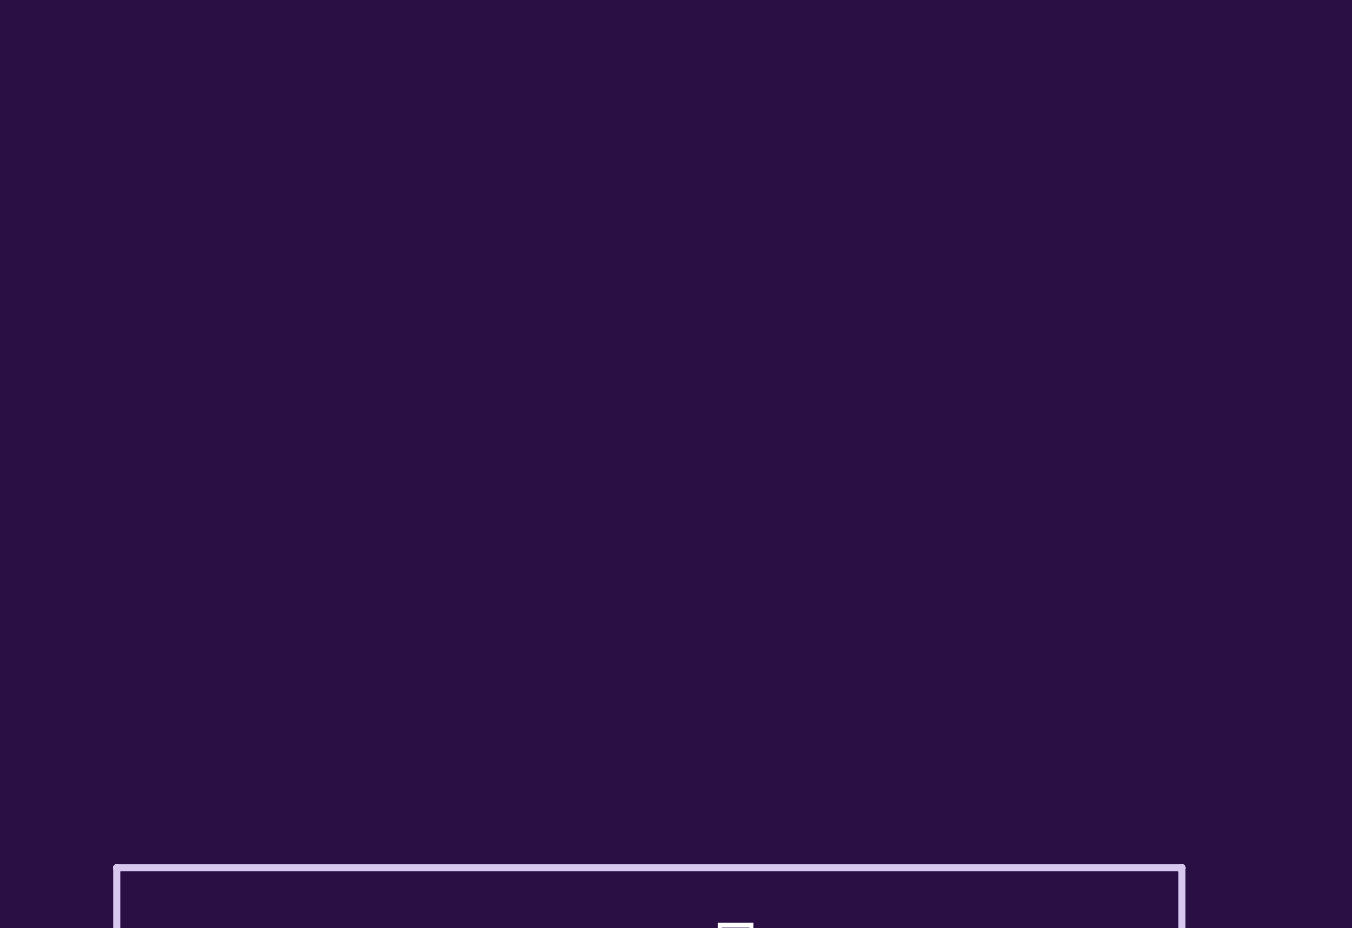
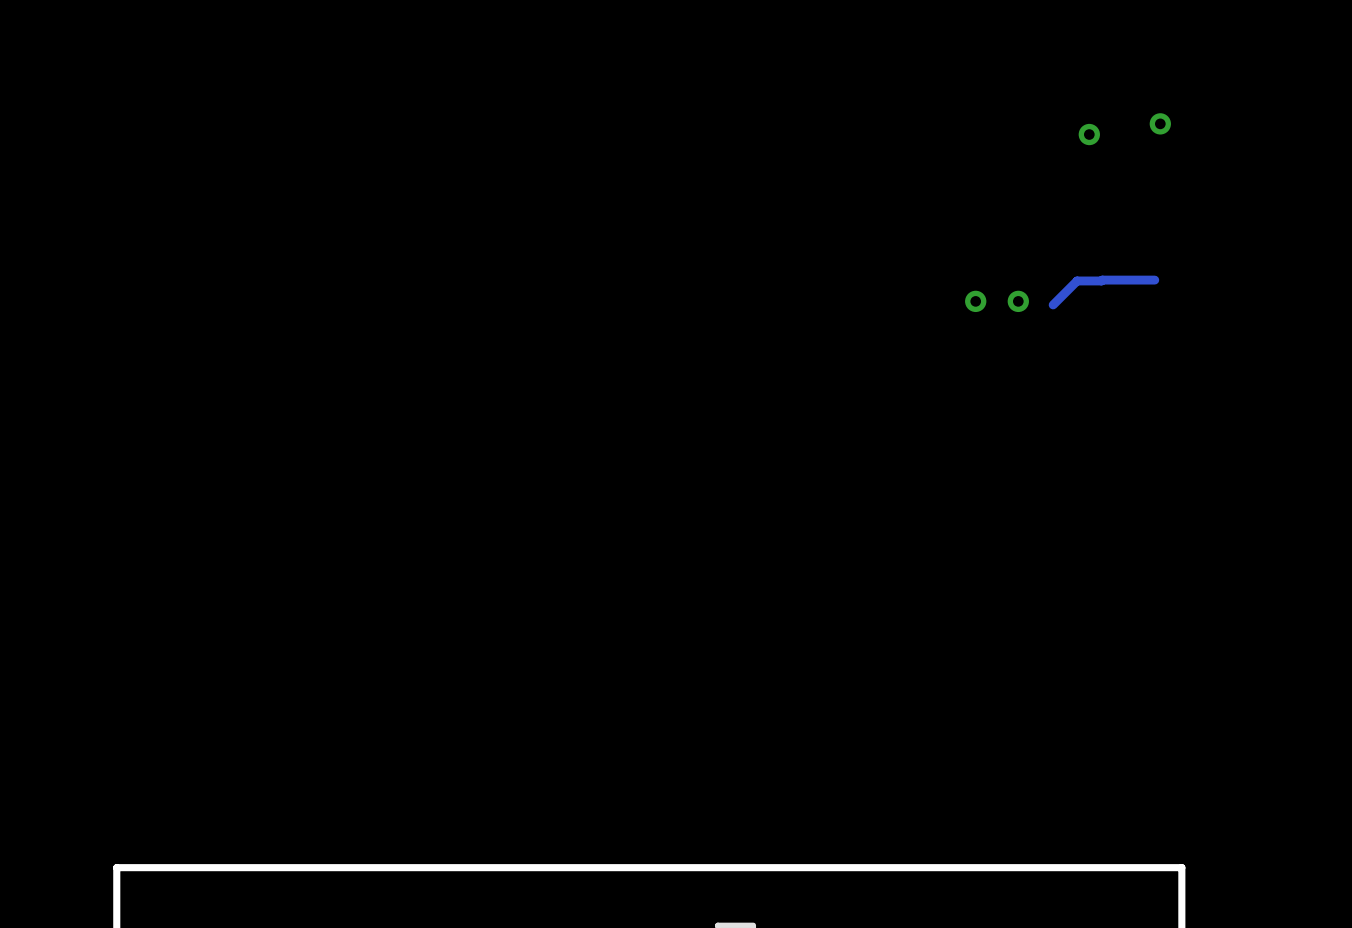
via: none -> (1160, 123)
via: none -> (1089, 134)
track: none -> (1154, 280) (1077, 280) (1053, 304)
via: none -> (975, 301)
via: none -> (1018, 301)

